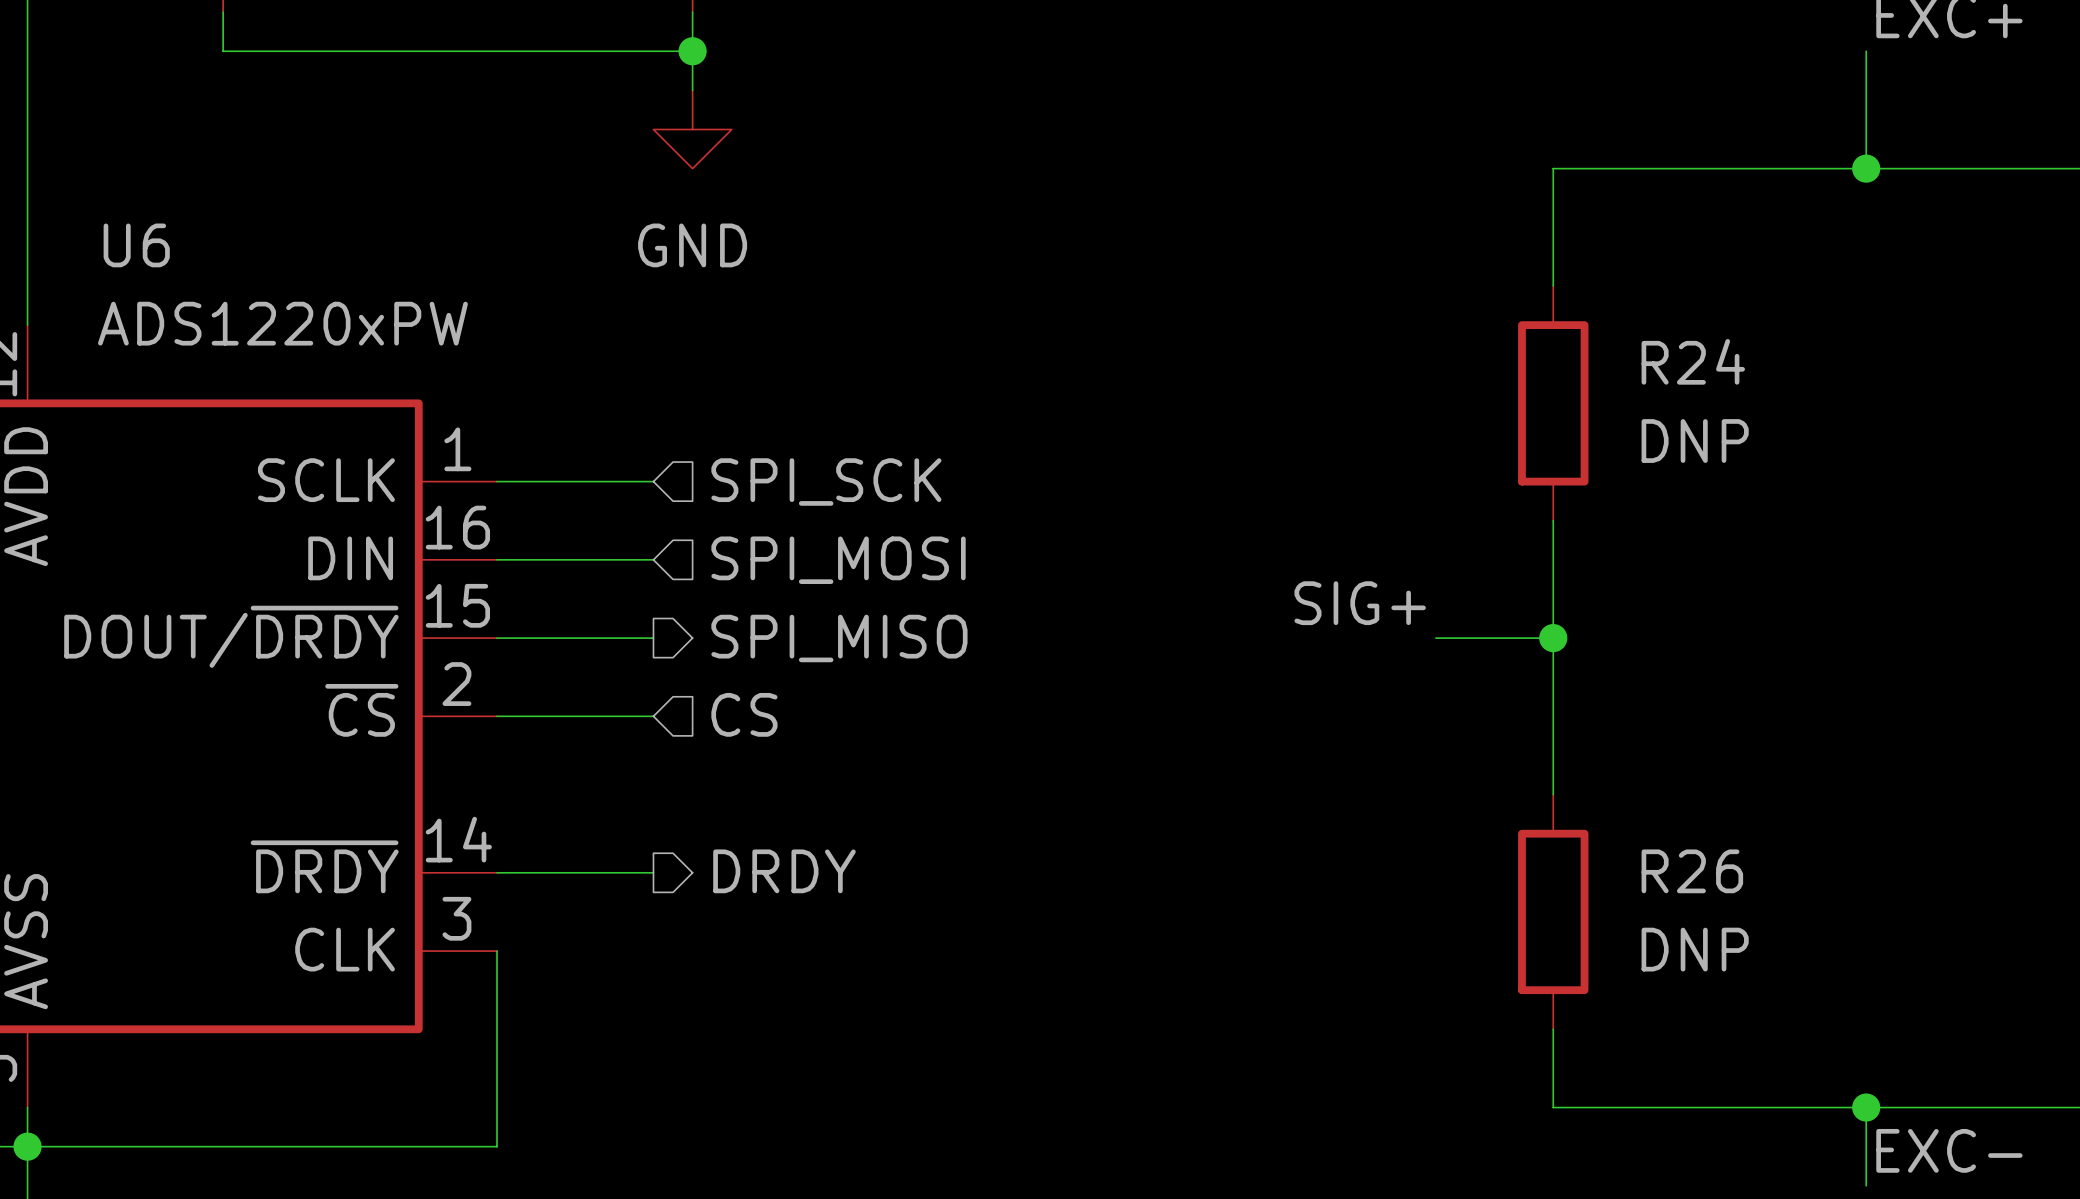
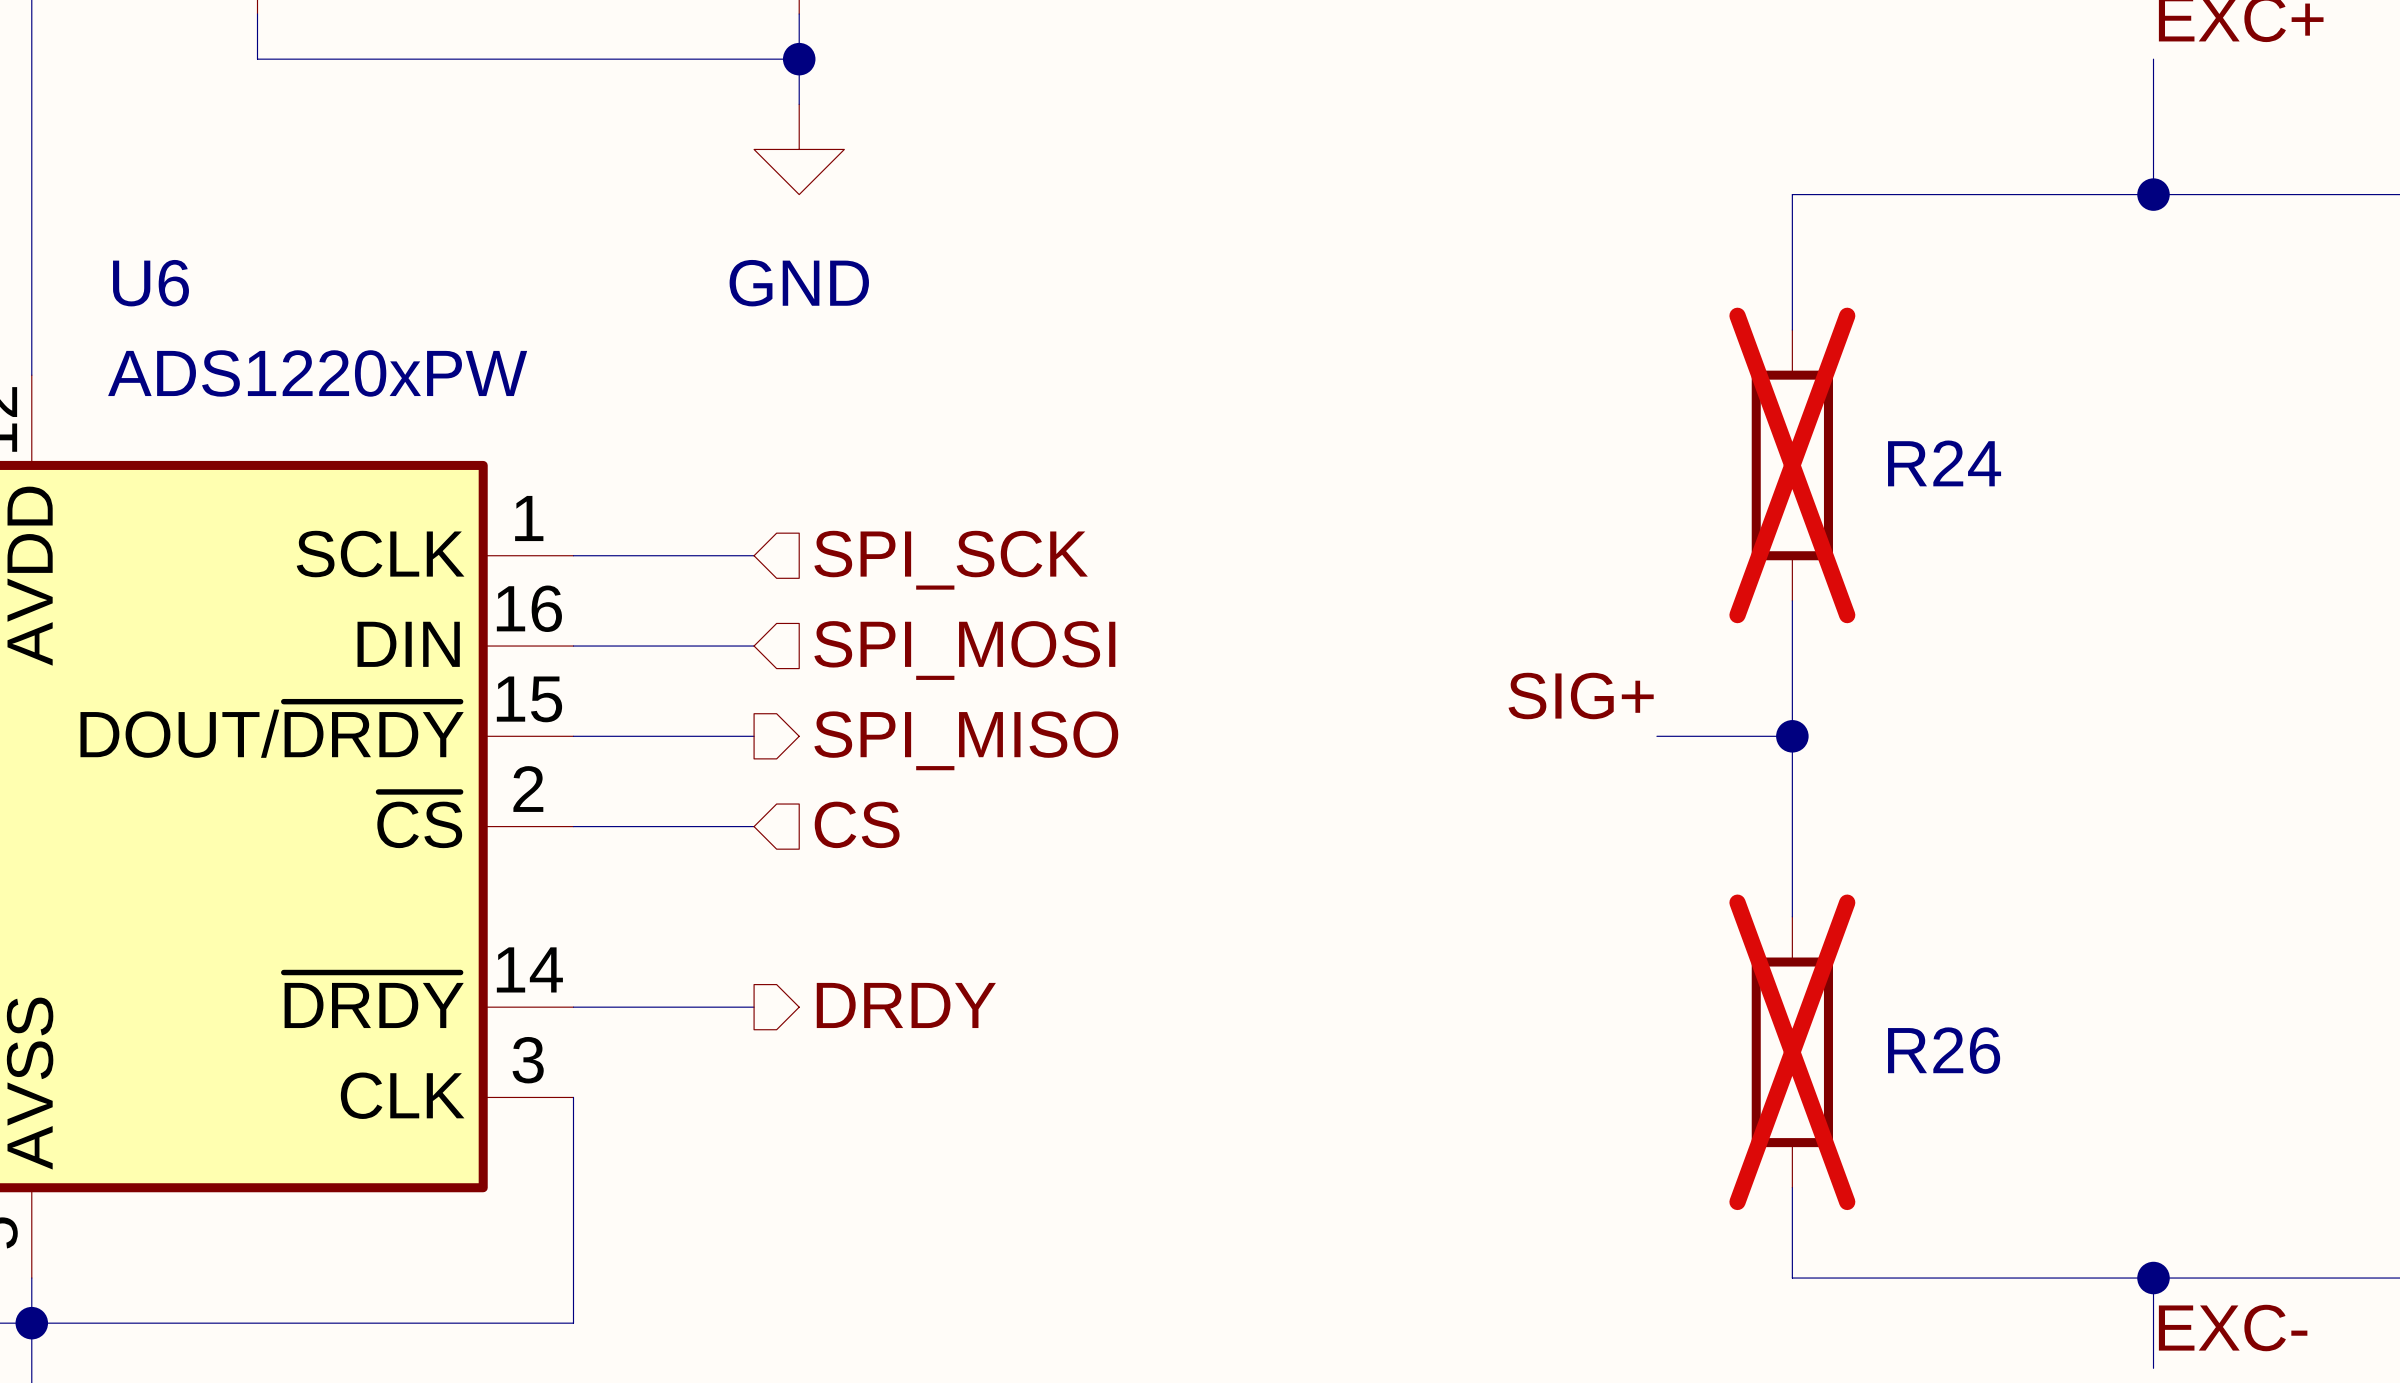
R24 name position: R24 (1693, 361) -> R24 (1944, 463)
R24 do-not-place cross: none -> (1792, 465)
R24 value: DNP (1695, 441) -> none
R26 name position: R26 (1692, 871) -> R26 (1944, 1050)
R26 do-not-place cross: none -> (1792, 1052)
R26 value: DNP (1695, 949) -> none

